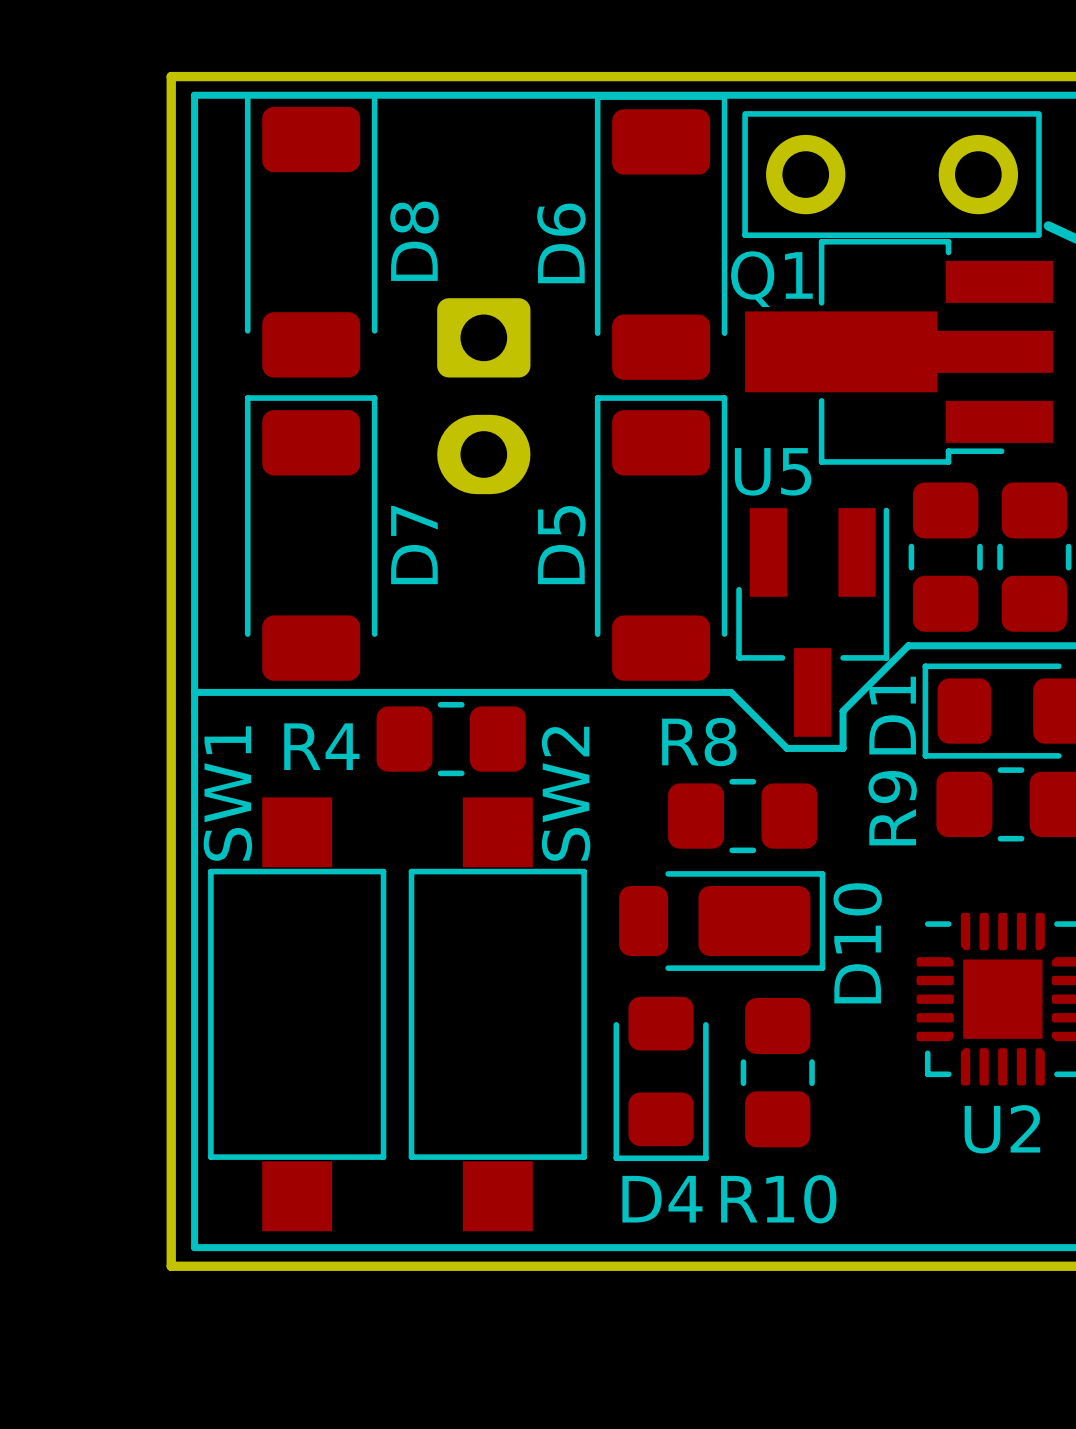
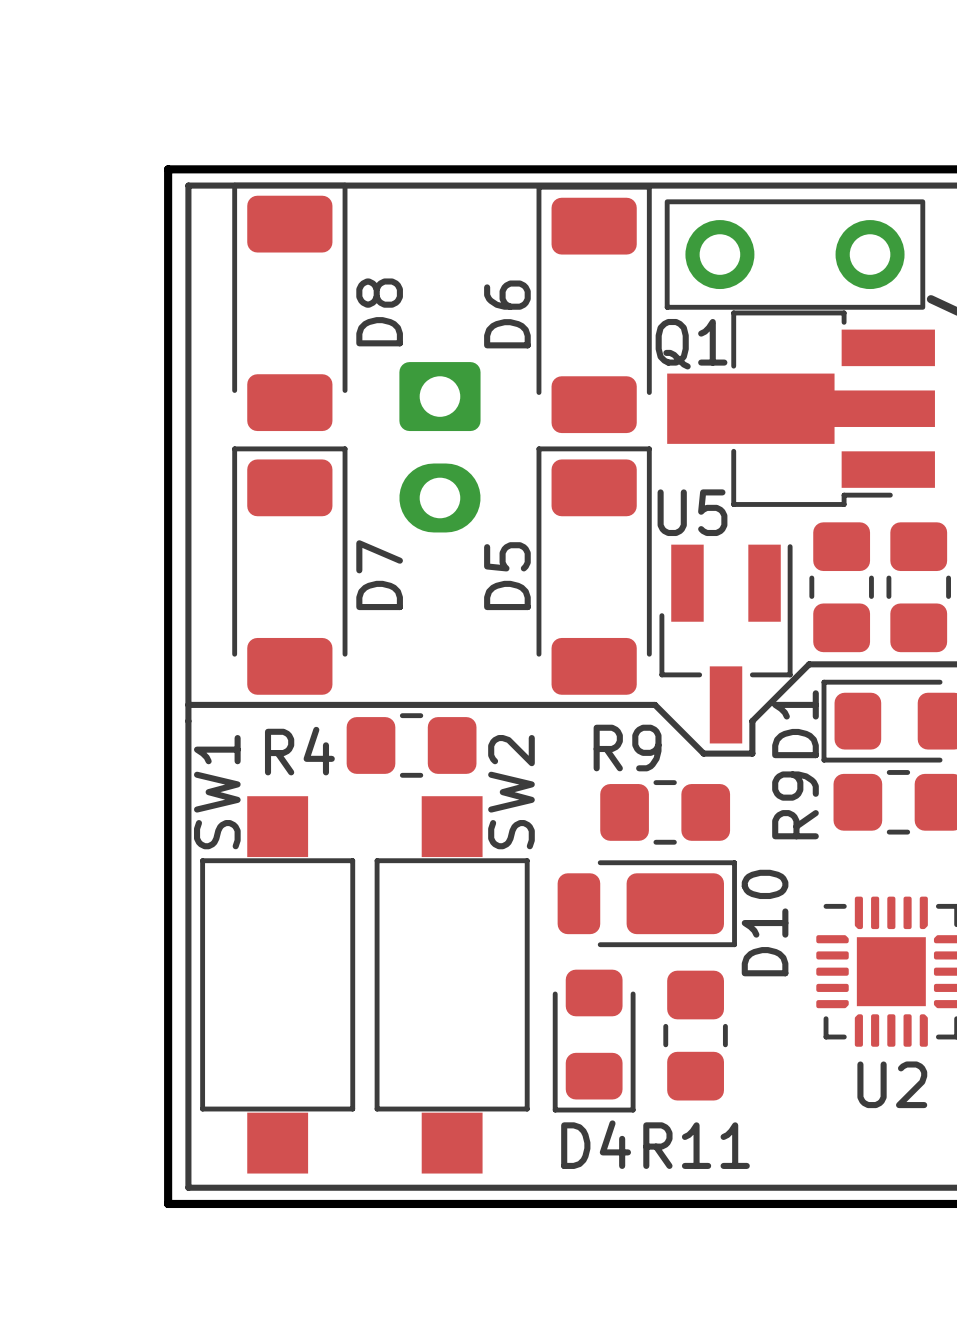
R8 name: R8 (699, 742) -> R9 (627, 748)
R10 name: R10 (778, 1199) -> R11 (696, 1145)

